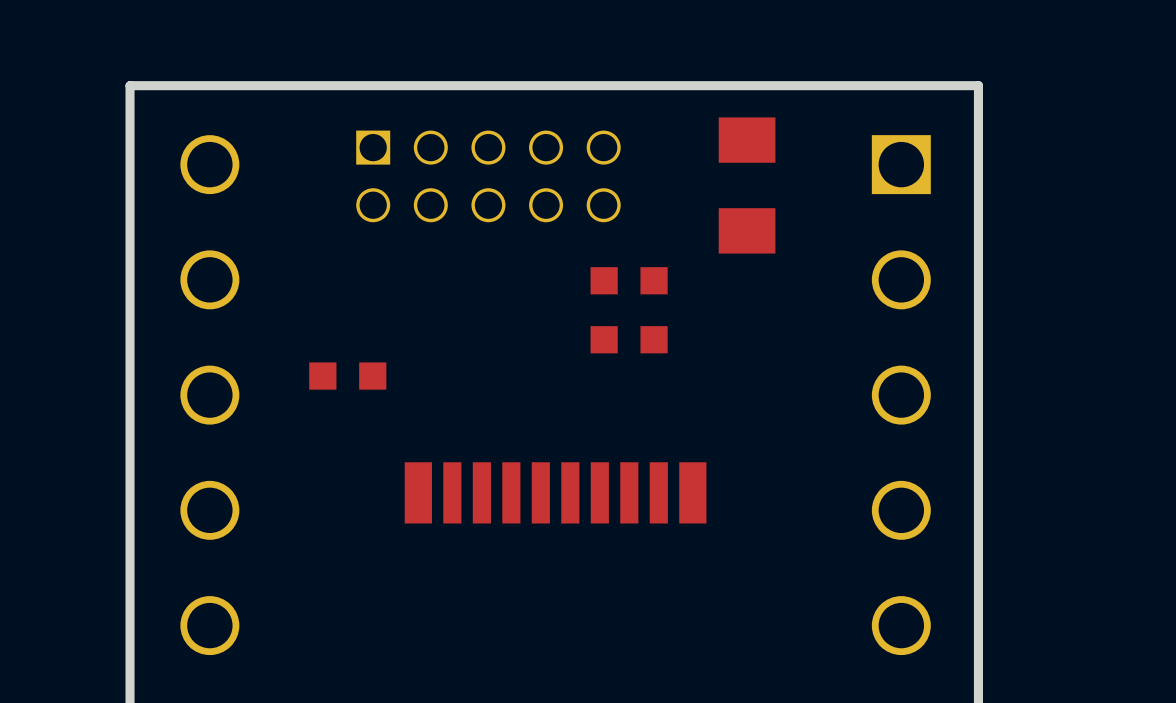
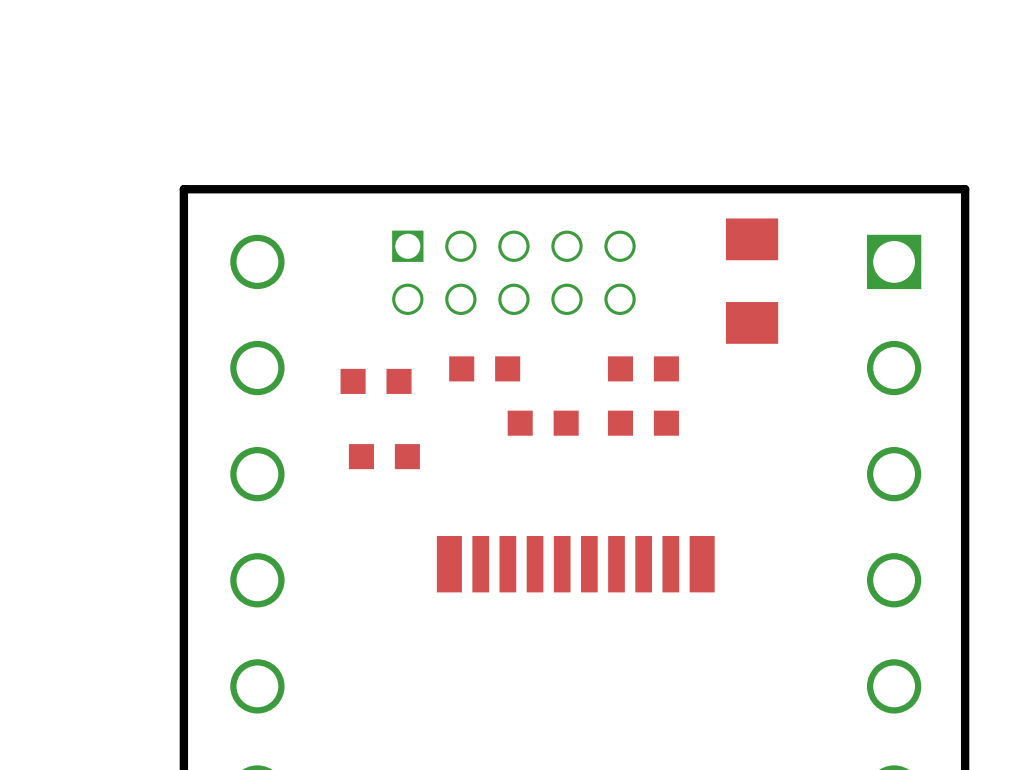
part: none -> (484, 368)
part: none -> (376, 381)
part: none -> (543, 423)

